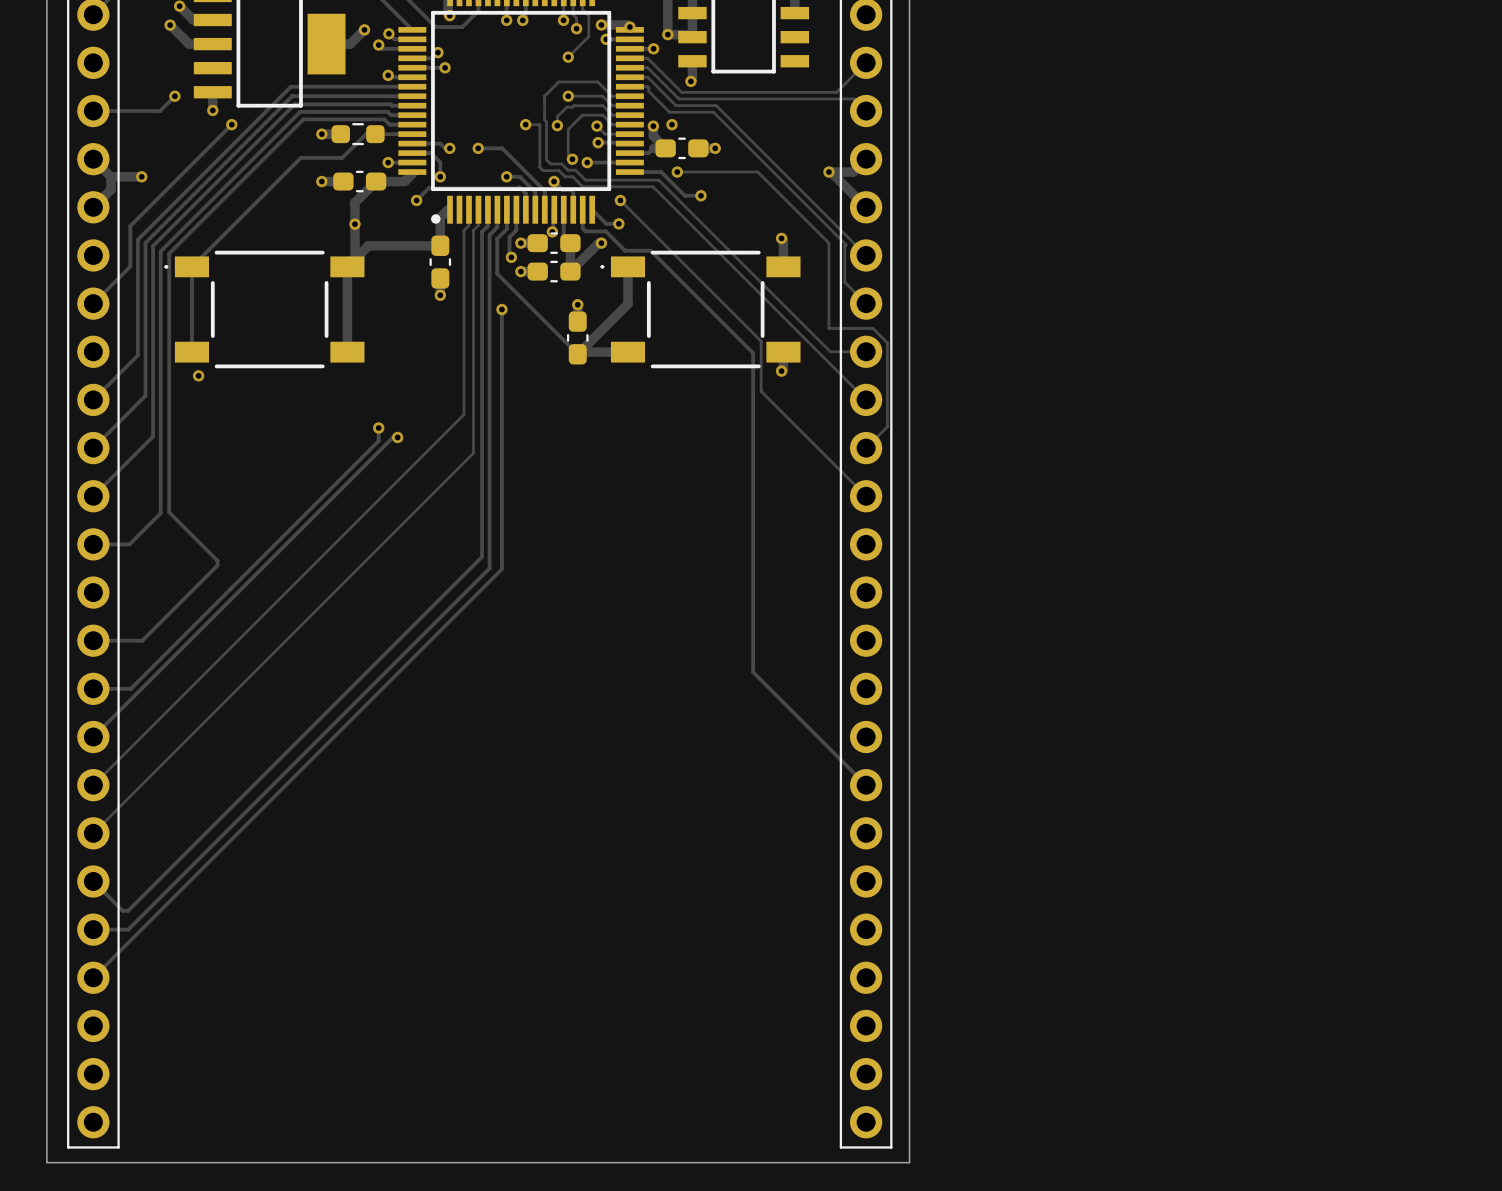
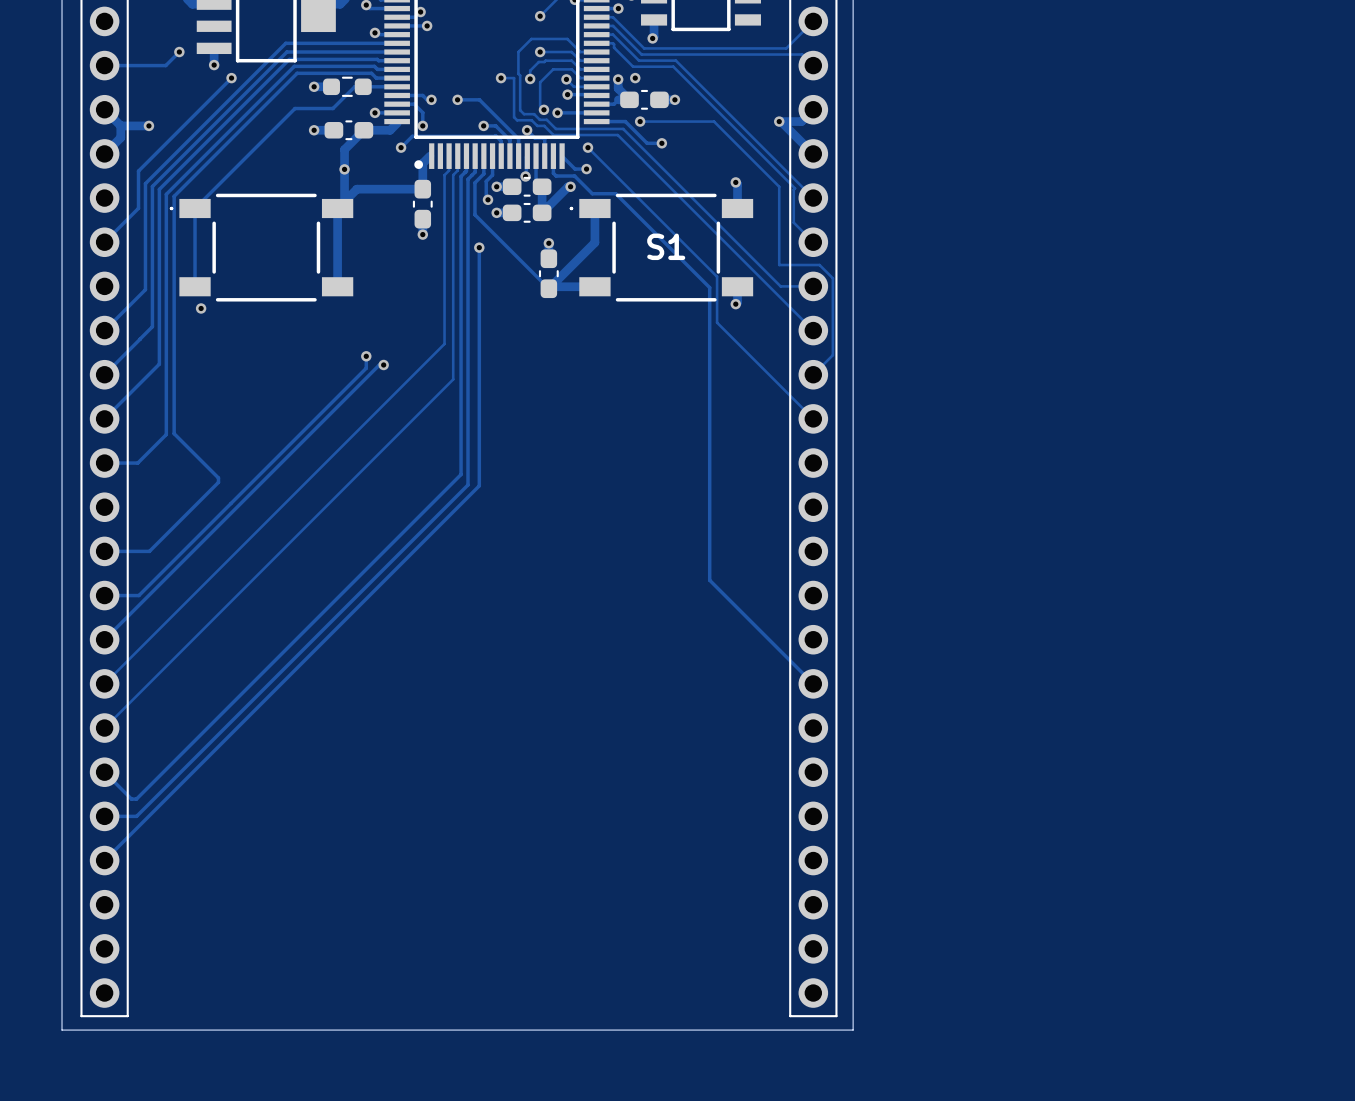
S1 name: none -> S1 (666, 246)

